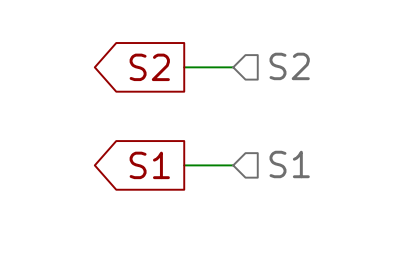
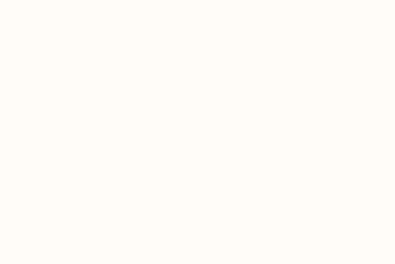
hierarchical label: S2 (289, 66) -> none
global label: S2 (149, 67) -> none
wire: (184, 67) (233, 67) -> none
hierarchical label: S1 (289, 164) -> none
global label: S1 (149, 165) -> none
wire: (184, 165) (233, 165) -> none

